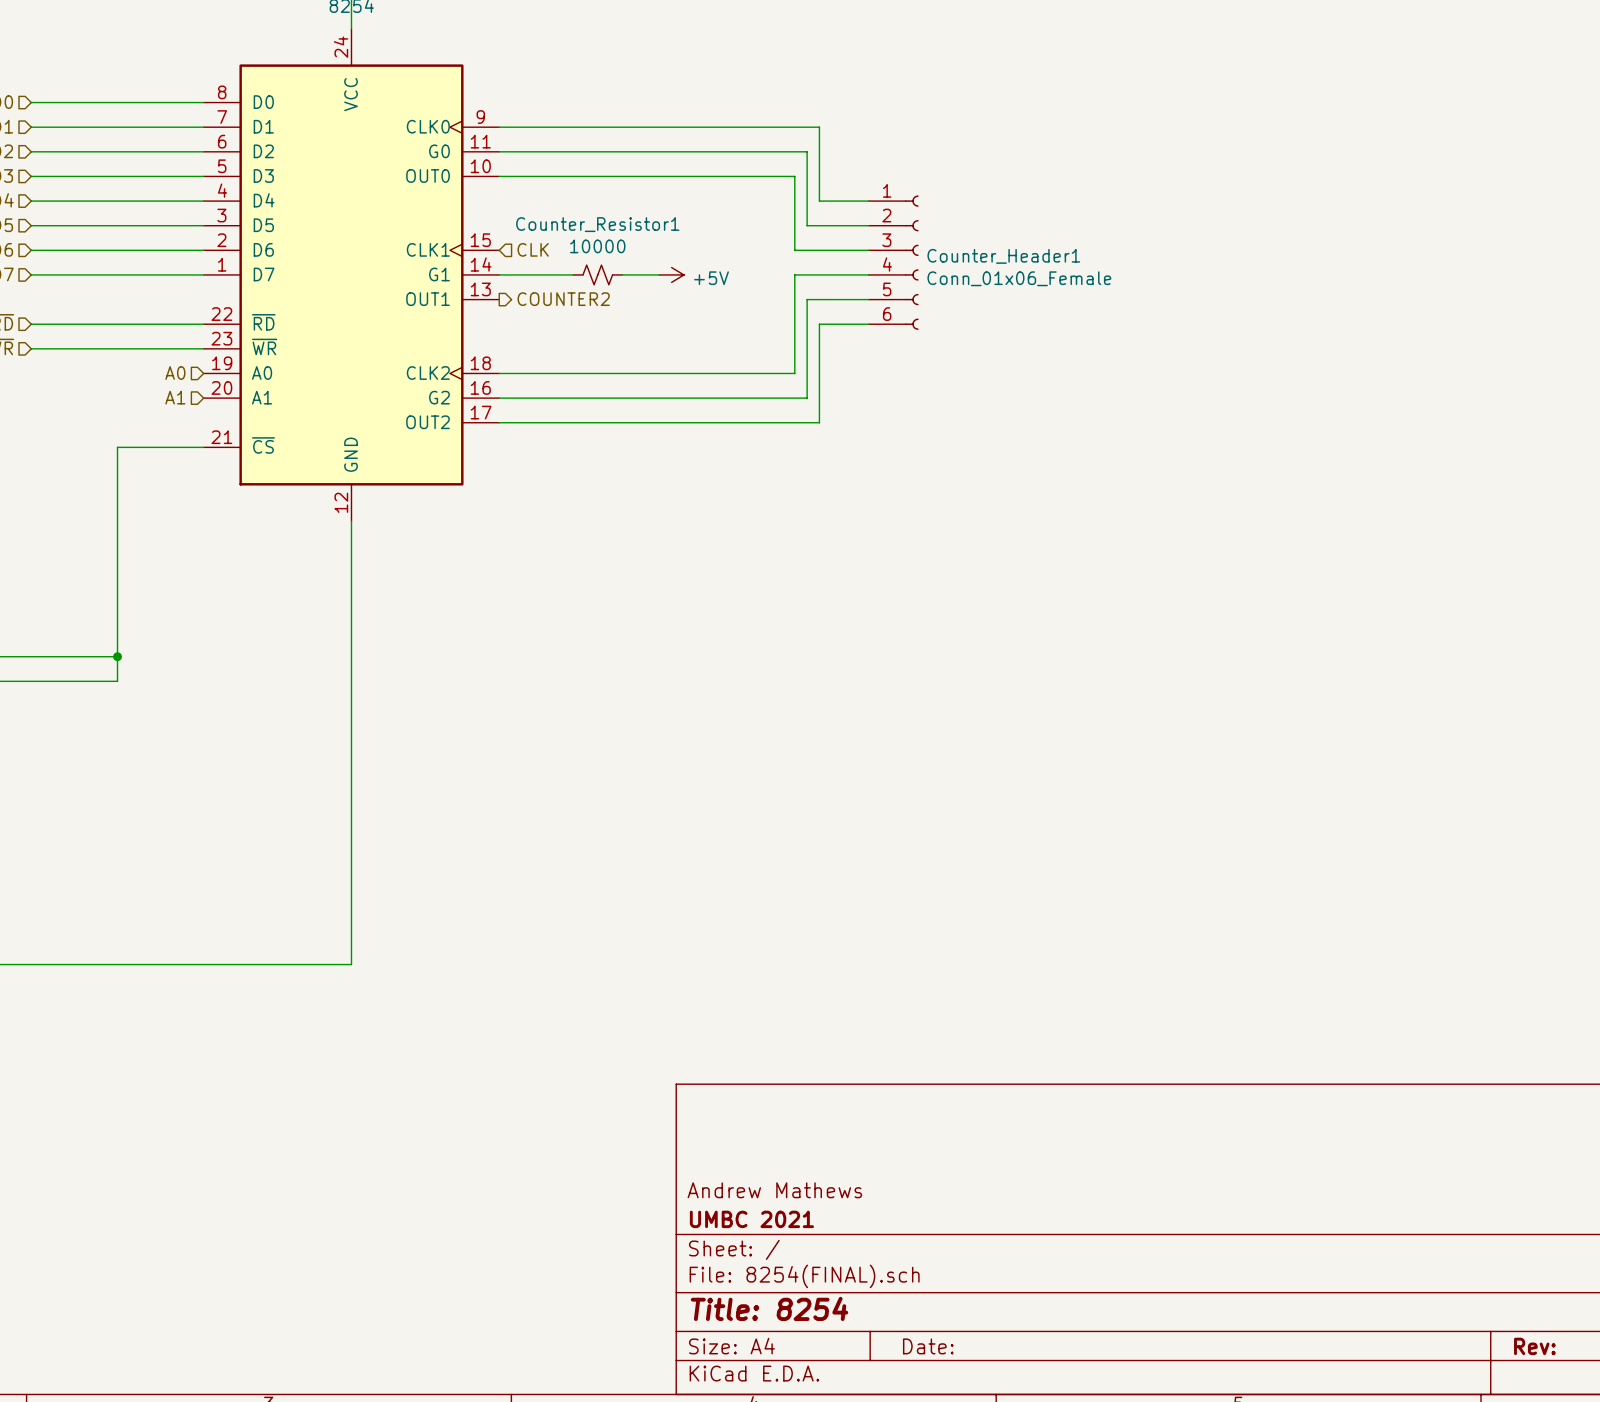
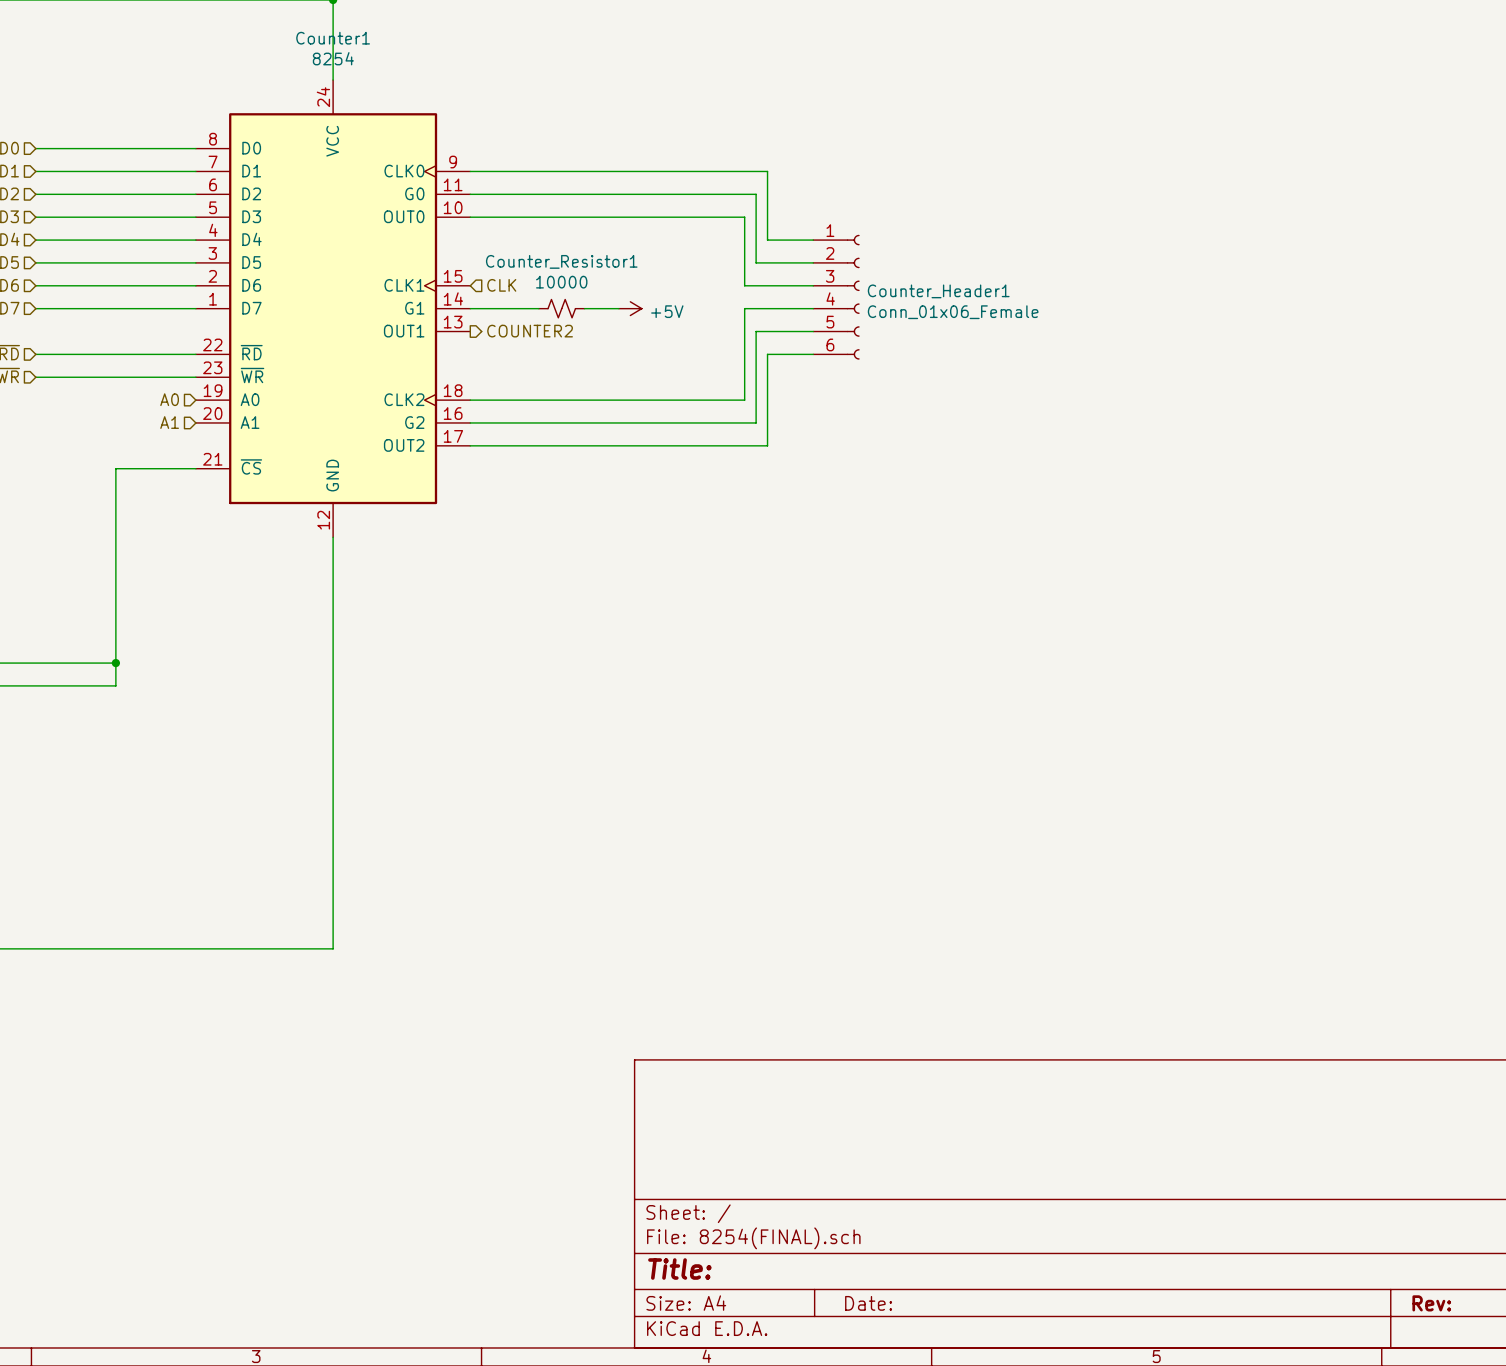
title block: Andrew Mathews (774, 1190) -> none
title block: UMBC 2021 (751, 1219) -> none
title block: Title: 8254 (769, 1308) -> Title: (679, 1269)

